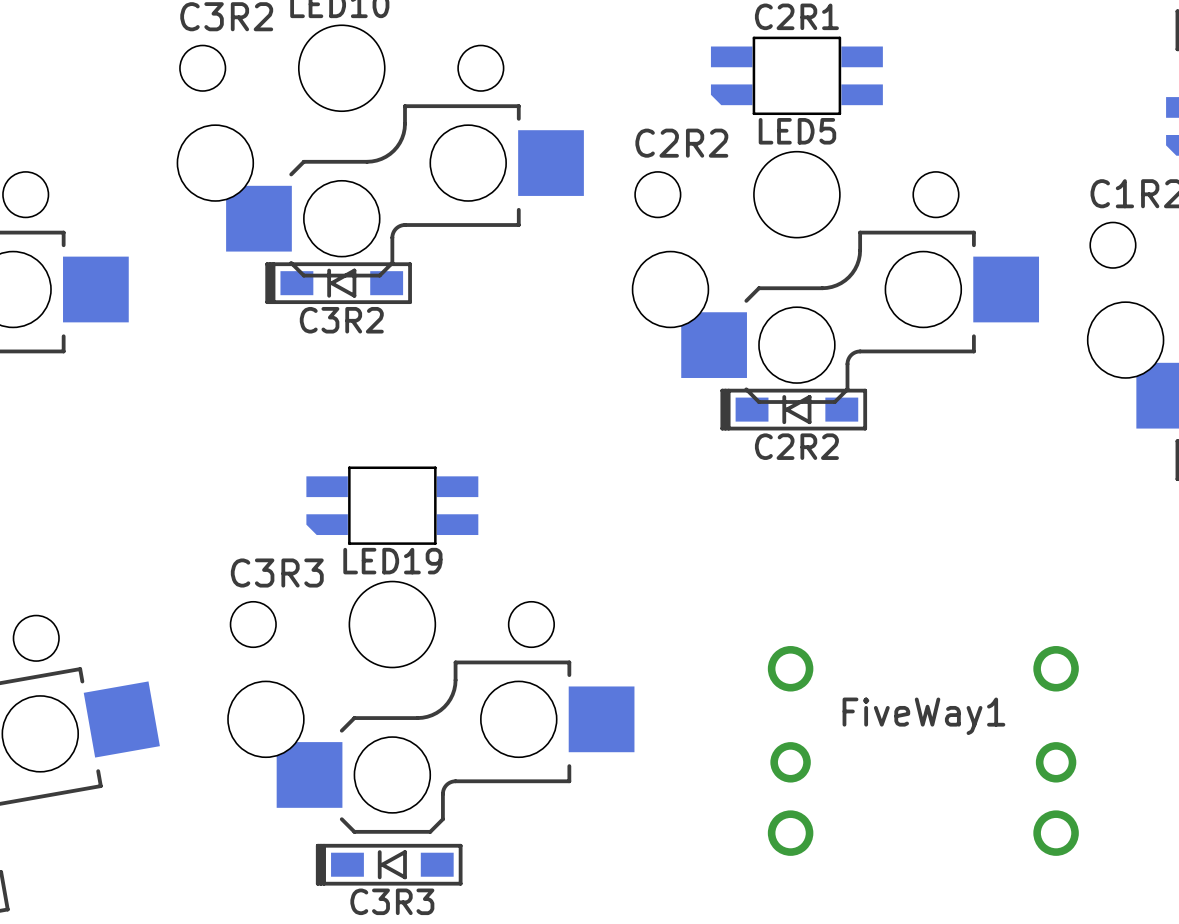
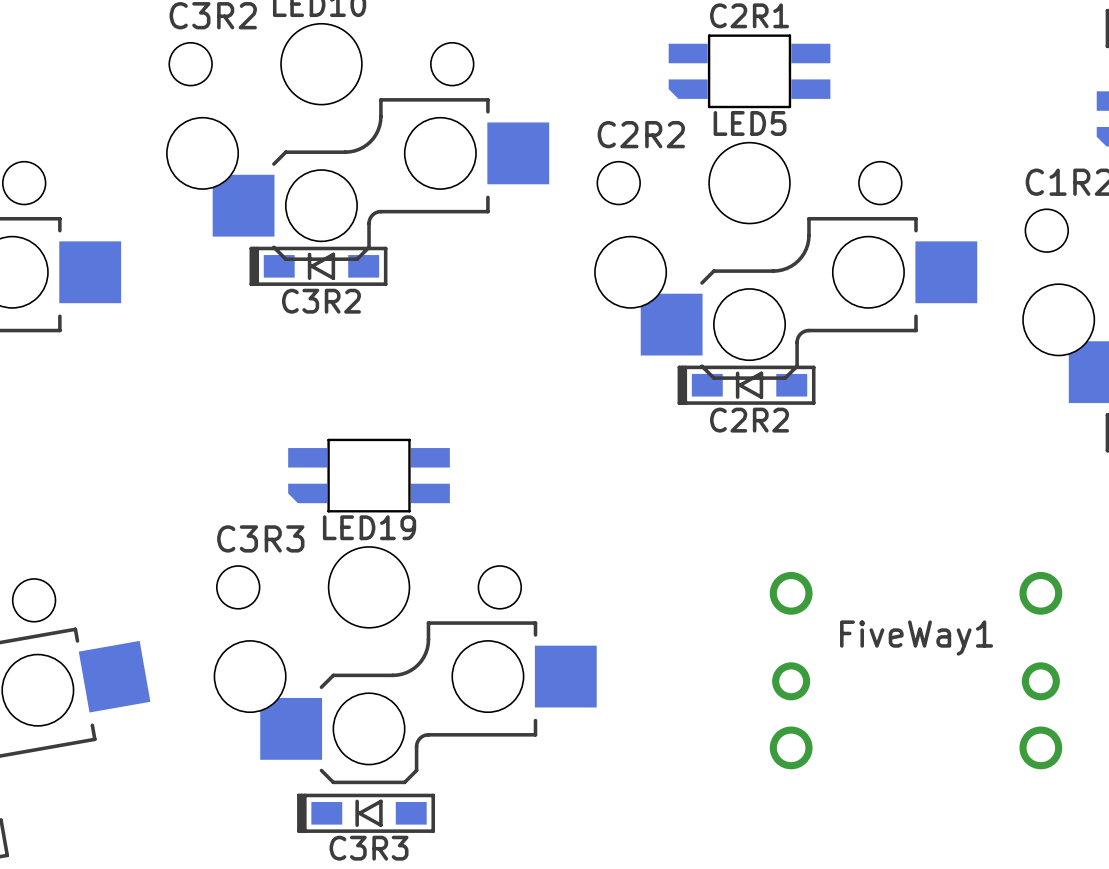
FiveWay1 position: (923, 750) -> (915, 670)

